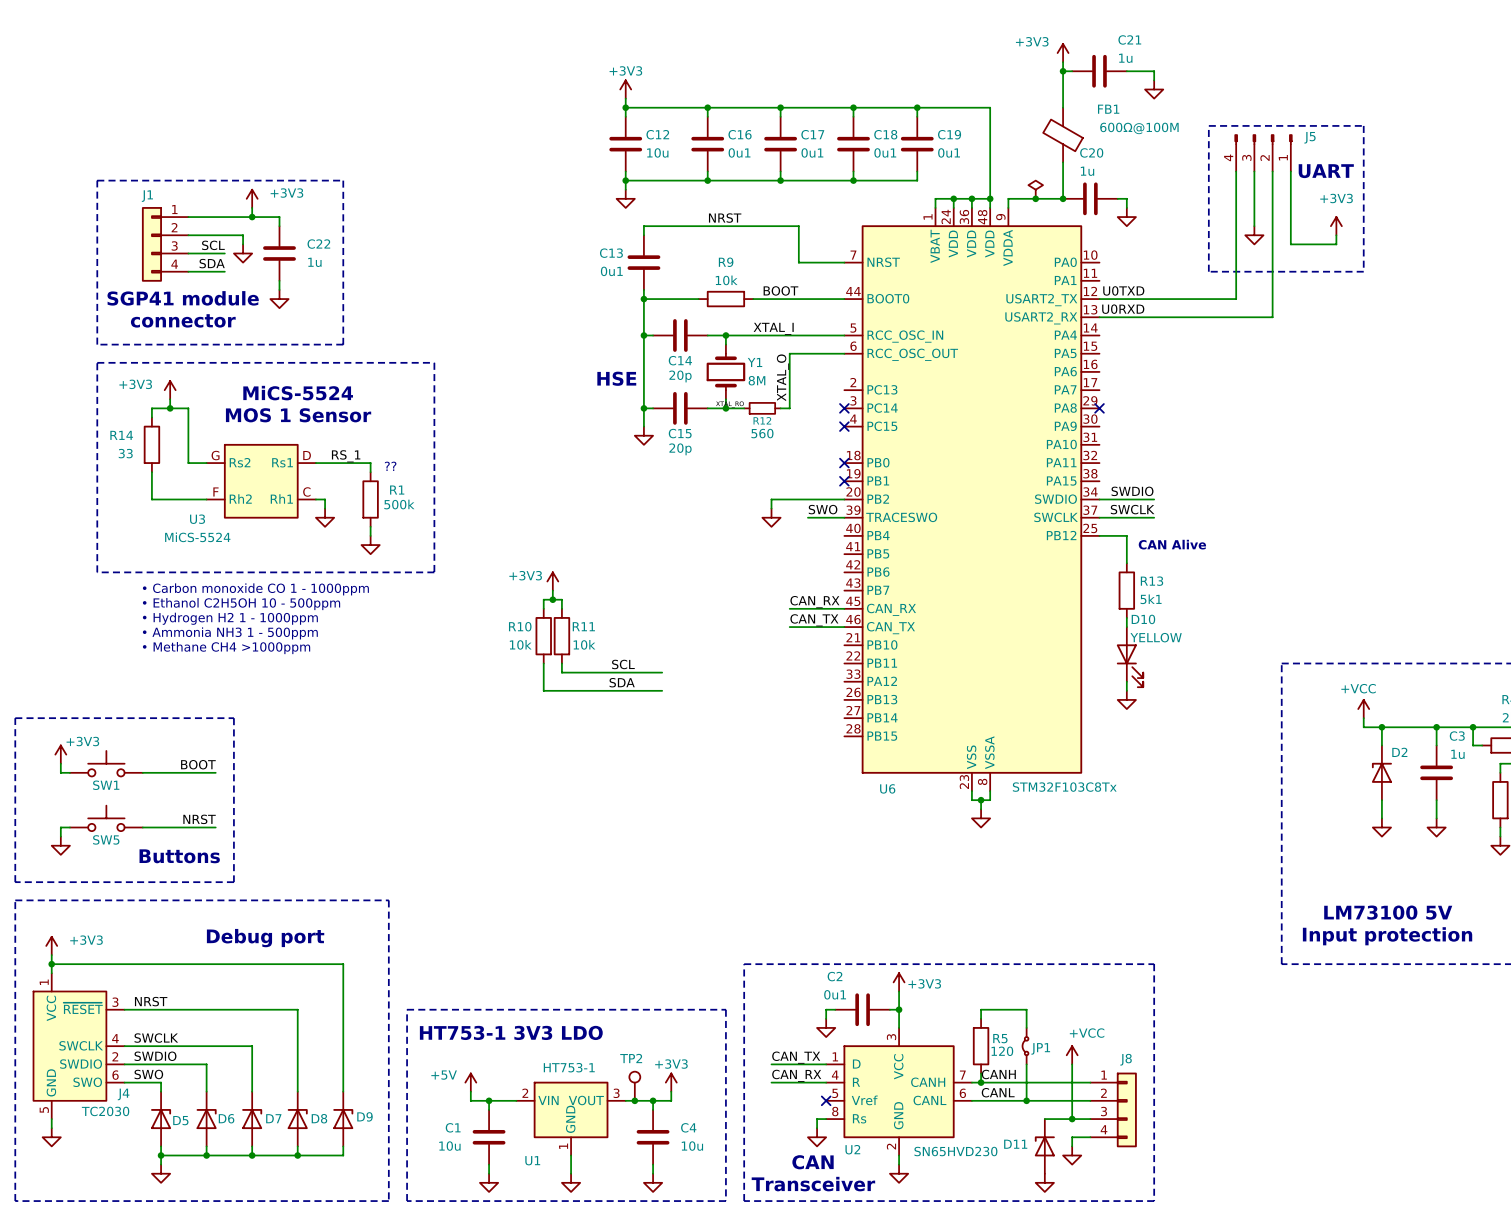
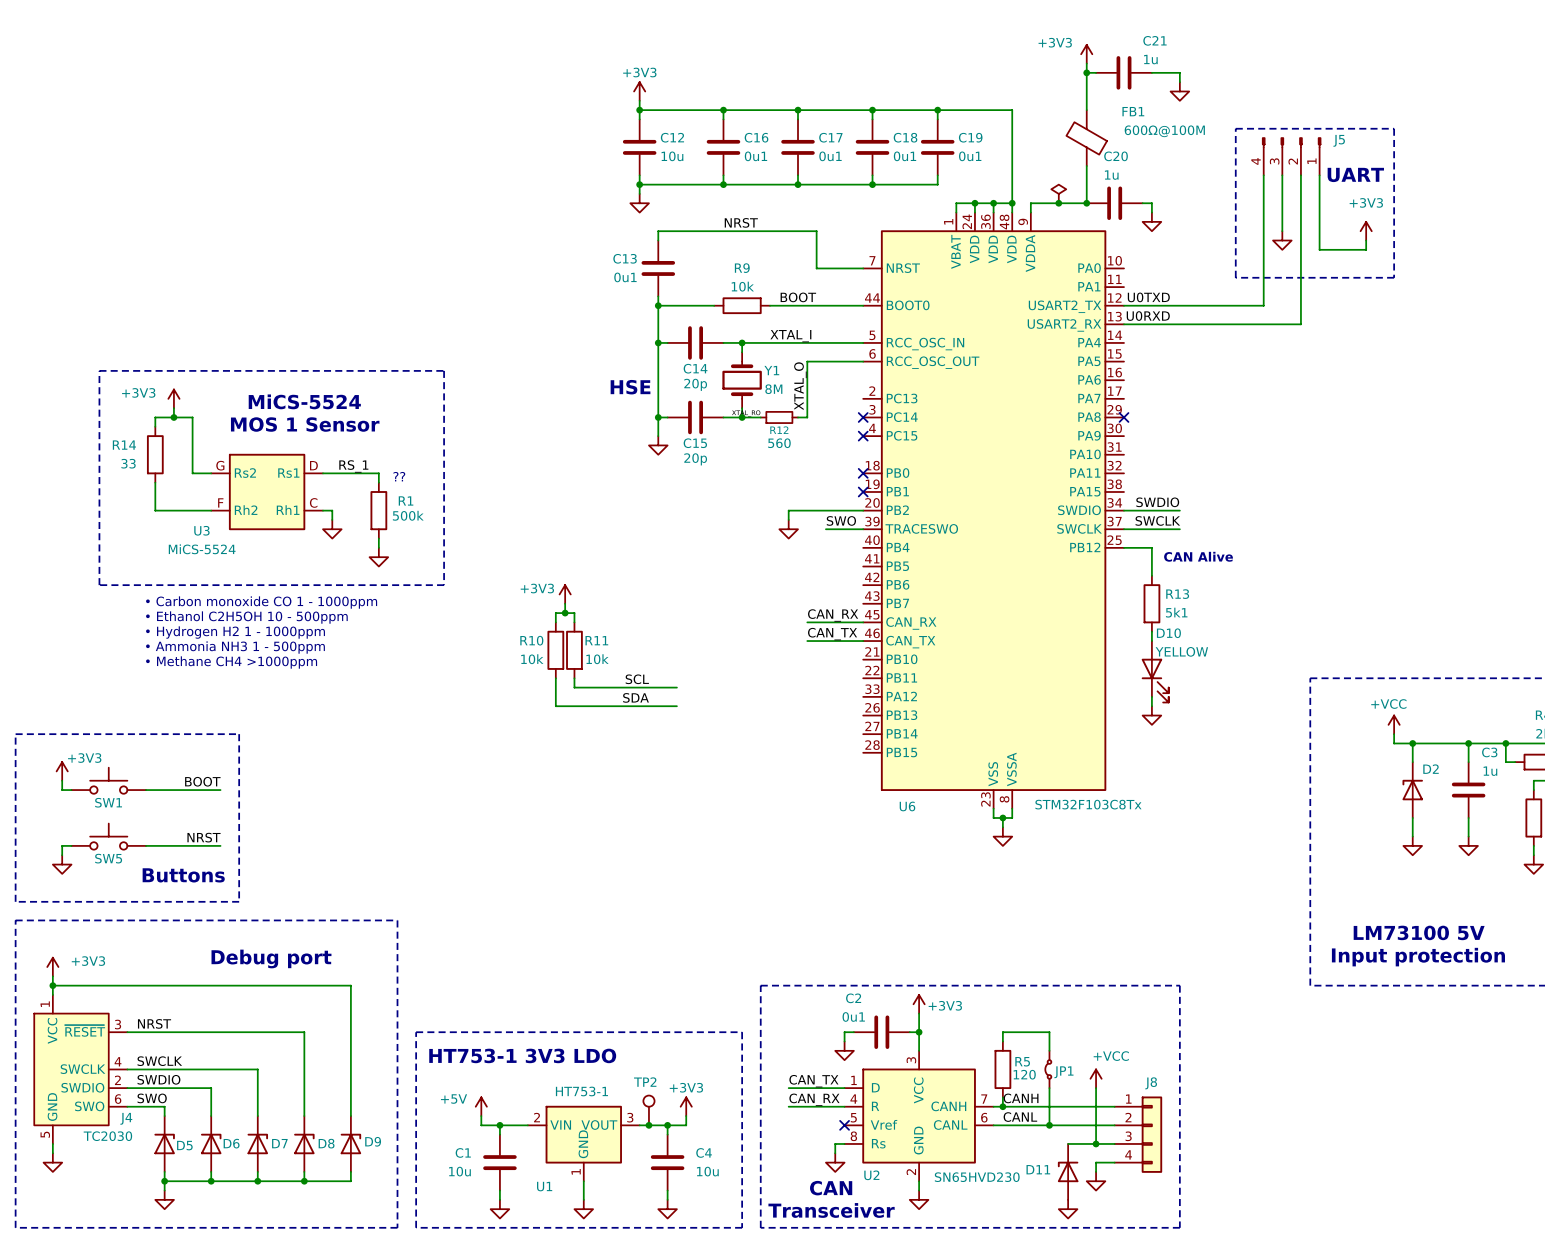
line: (97, 180) (343, 180) (343, 344) (97, 344) (97, 180) -> none
power symbol: +3V3 (252, 198) -> none
wire: (252, 207) (252, 217) -> none
wire: (188, 217) (279, 217) (279, 226) -> none
junction: (252, 217) -> none
wire: (188, 235) (243, 235) (243, 244) -> none
J1: (165, 244) -> none
label: SCL (213, 245) -> none
wire: (188, 253) (224, 253) -> none
power symbol: (243, 253) -> none
C22: 1u (279, 253) -> none
label: SDA (212, 263) -> none
wire: (188, 271) (224, 271) -> none
wire: (279, 280) (279, 289) -> none
text: SGP41 module (183, 298) -> none
power symbol: (279, 299) -> none
text: connector (183, 320) -> none

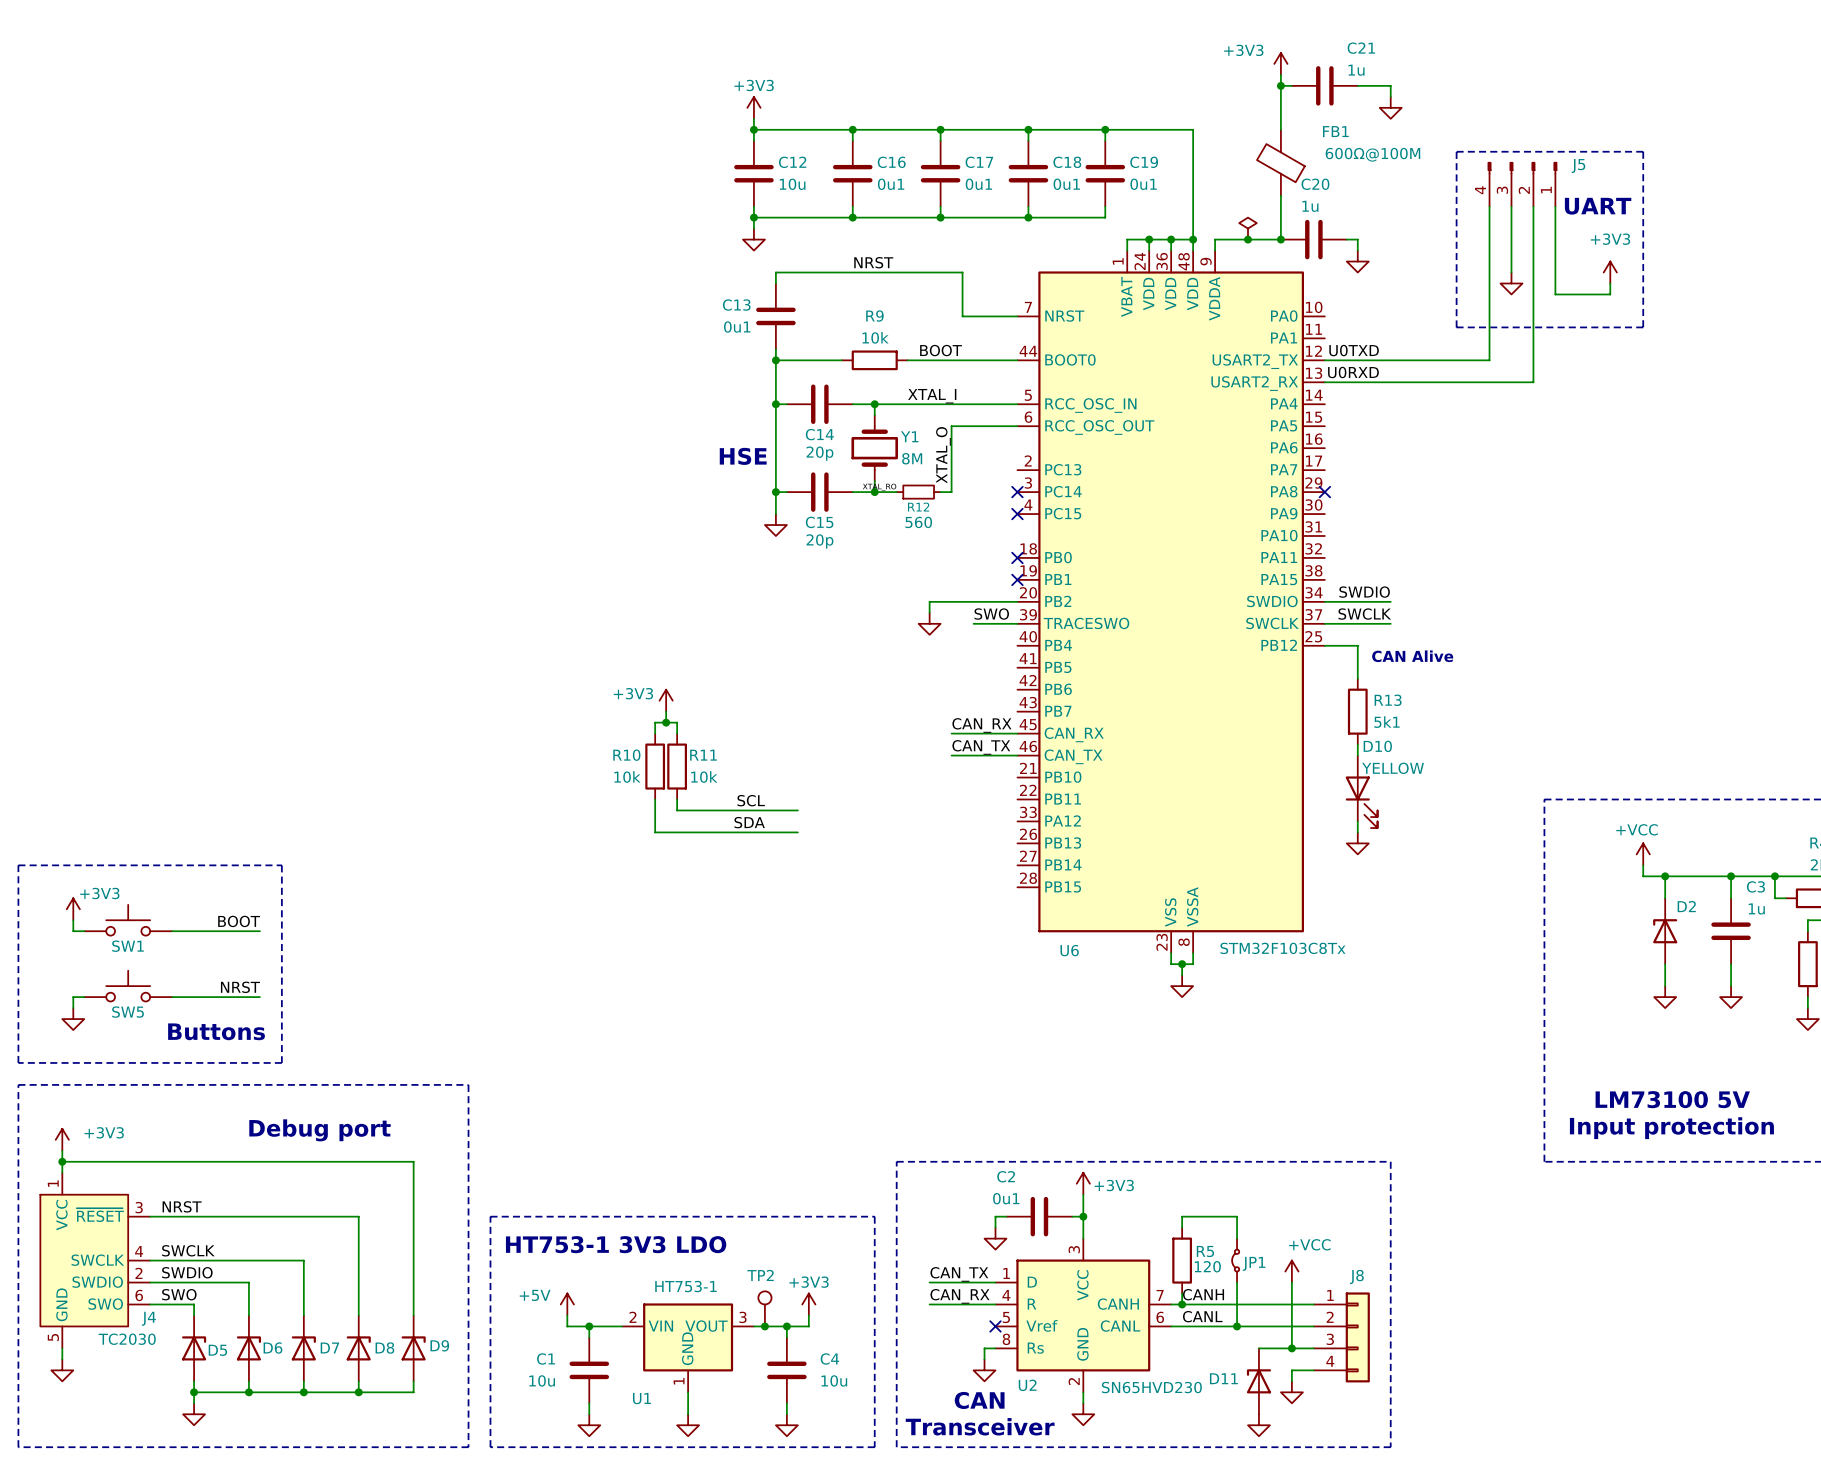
line: (99, 370) (444, 370) (444, 585) (99, 585) (99, 370) -> none
power symbol: +3V3 (173, 398) -> none
text: MiCS-5524 (304, 401) -> none
wire: (173, 408) (173, 417) -> none
junction: (173, 417) -> none
text: MOS 1 Sensor (305, 424) -> none
wire: (155, 426) (155, 417) (192, 417) (192, 473) (211, 473) -> none
R14: 33 (155, 454) -> none
label: RS_1 (353, 466) -> none
wire: (322, 473) (378, 473) (378, 482) -> none
text: ?? (399, 476) -> none
wire: (155, 482) (155, 510) (211, 510) -> none
U3: MiCS-5524 (267, 491) -> none
wire: (322, 510) (332, 510) (332, 519) -> none
R1: 500k (378, 510) -> none
power symbol: (332, 529) -> none
wire: (378, 538) (378, 547) -> none
power symbol: (378, 557) -> none
text: • Carbon monoxide CO 1 - 1000ppm (261, 602) -> none
text: • Ethanol C2H5OH 10 - 500ppm (246, 617) -> none
text: • Hydrogen H2 1 - 1000ppm (235, 632) -> none
text: • Ammonia NH3 1 - 500ppm (235, 647) -> none
text: • Methane CH4 >1000ppm (231, 662) -> none

